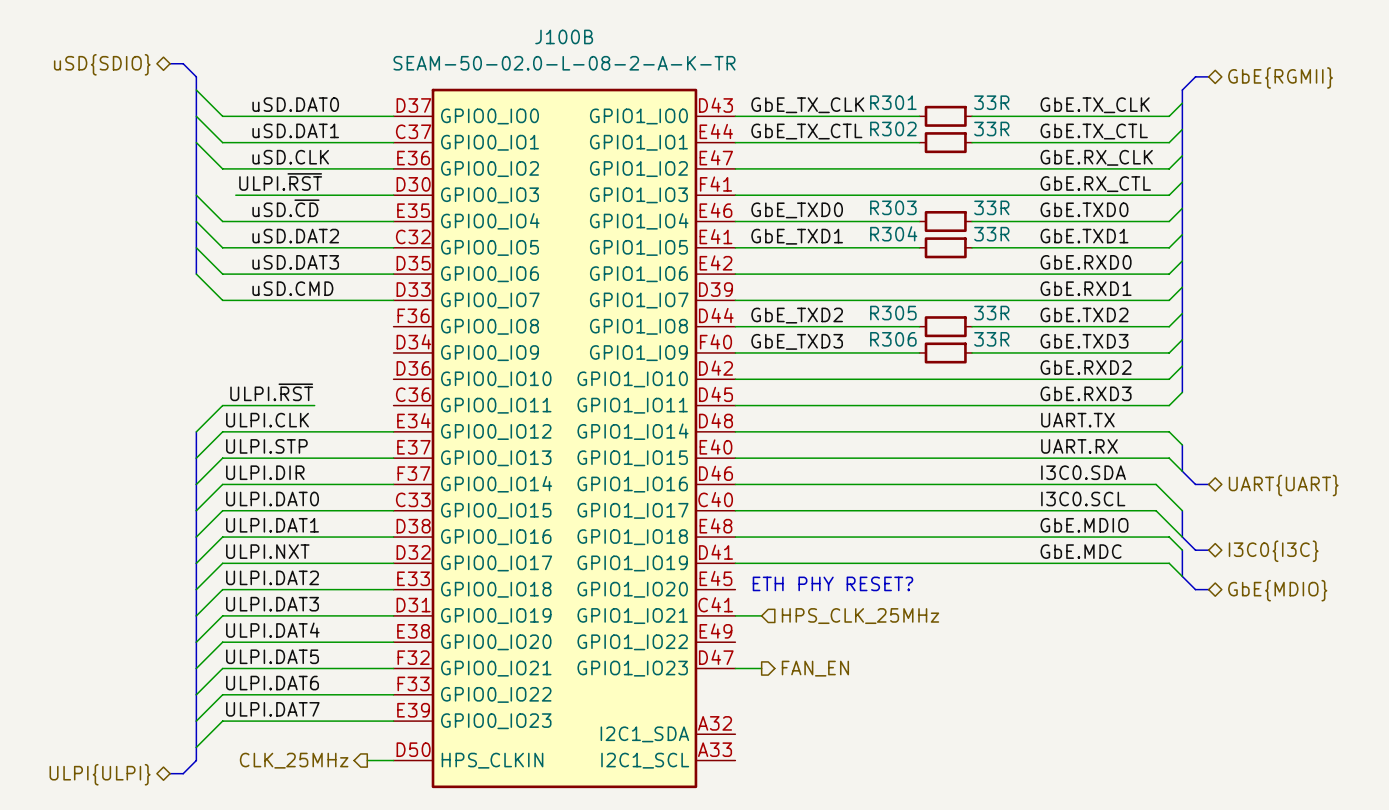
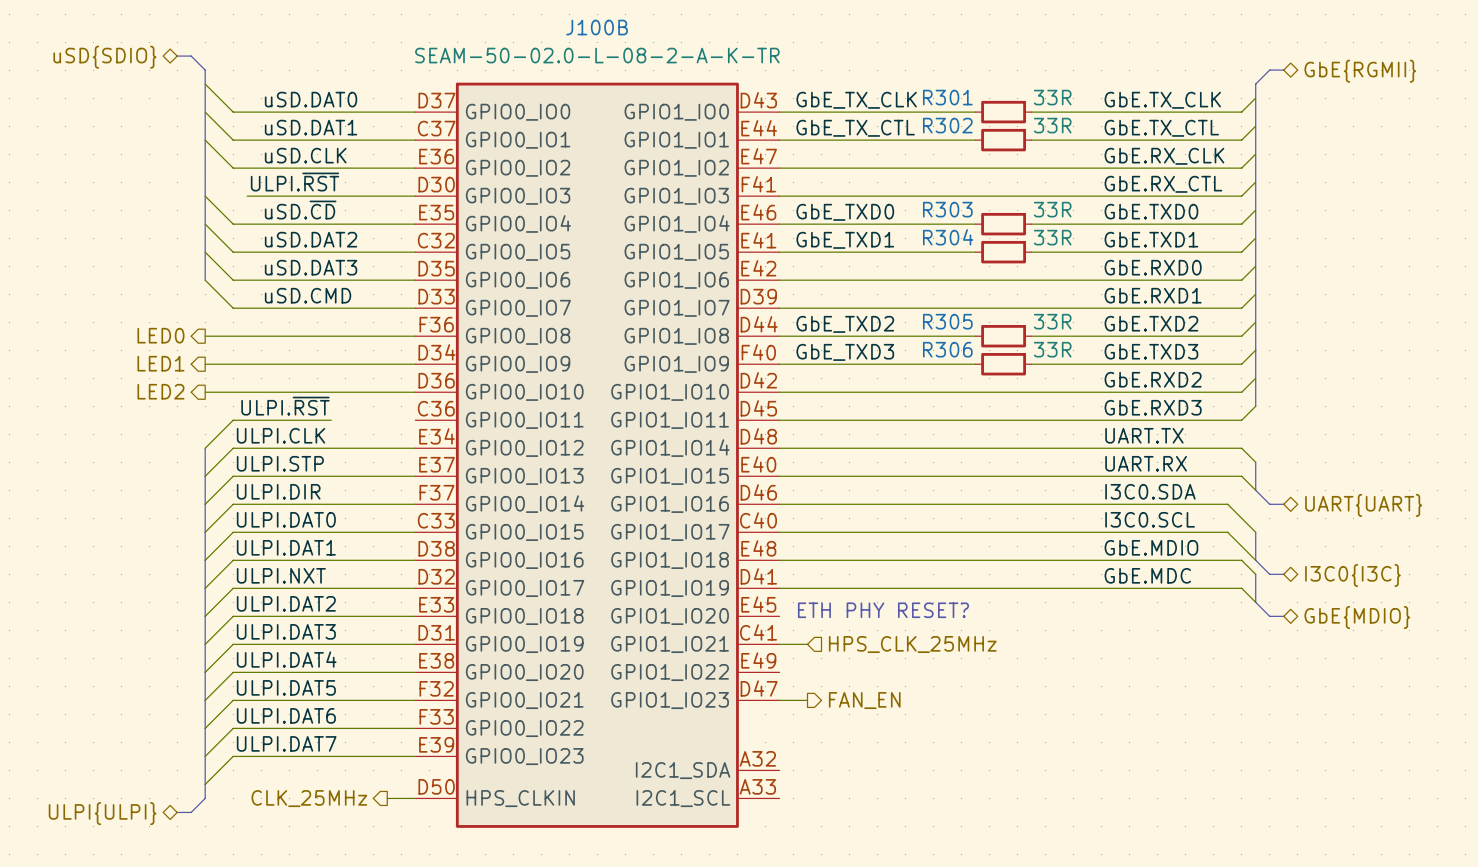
hierarchical label: none -> LED0 (160, 335)
wire: none -> (205, 336) (415, 336)
hierarchical label: none -> LED1 (160, 363)
wire: none -> (205, 364) (415, 364)
hierarchical label: none -> LED2 (160, 391)
wire: none -> (205, 392) (415, 392)

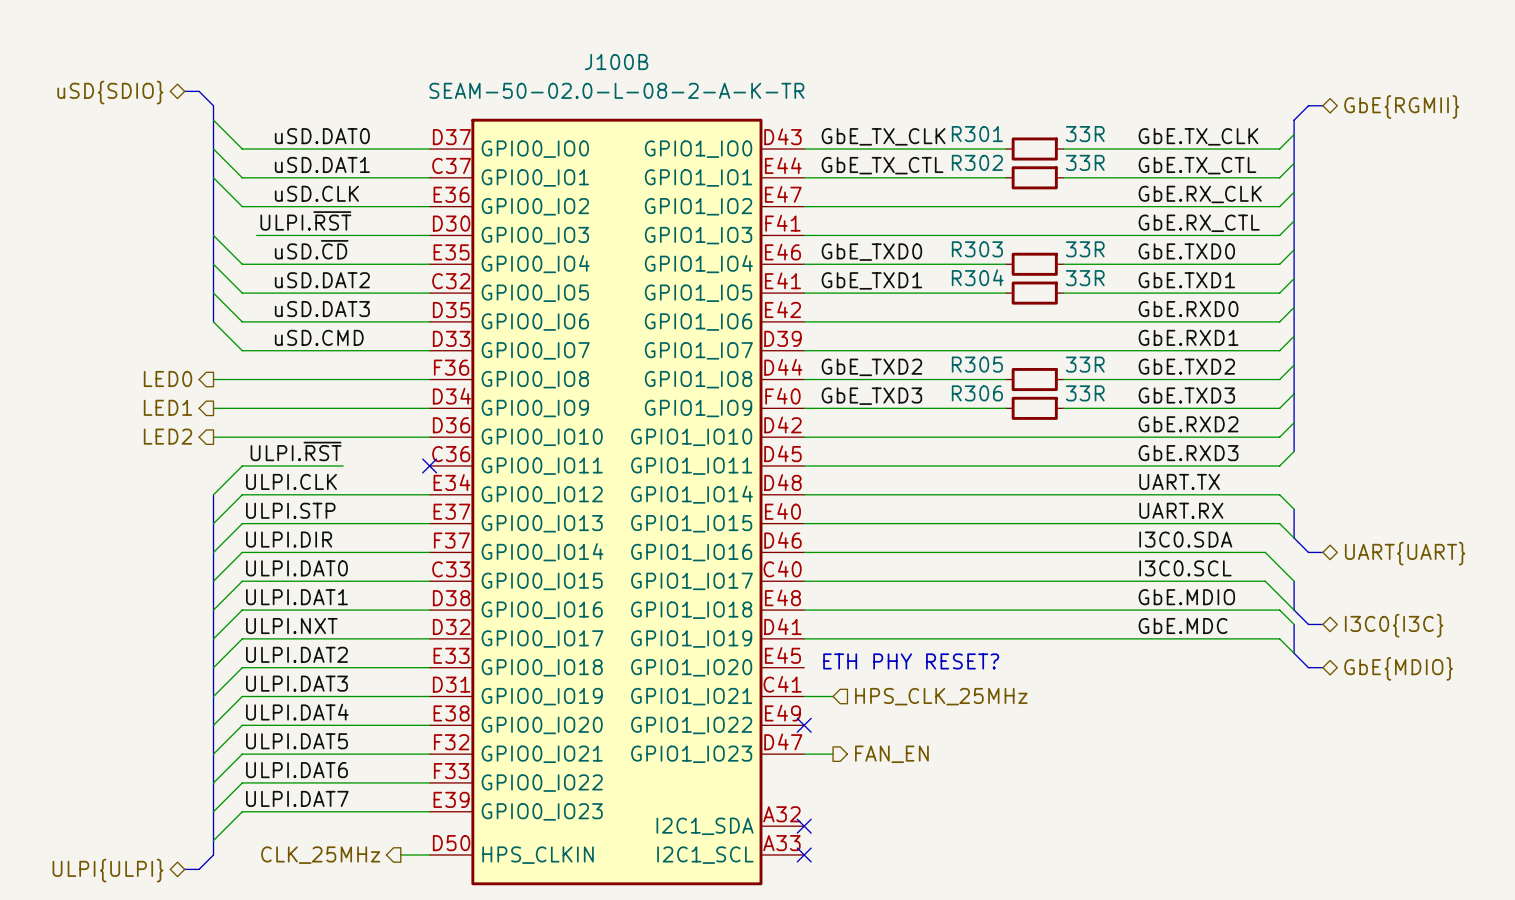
no-connect mark: none -> (429, 465)
no-connect mark: none -> (804, 725)
no-connect mark: none -> (804, 826)
no-connect mark: none -> (804, 854)

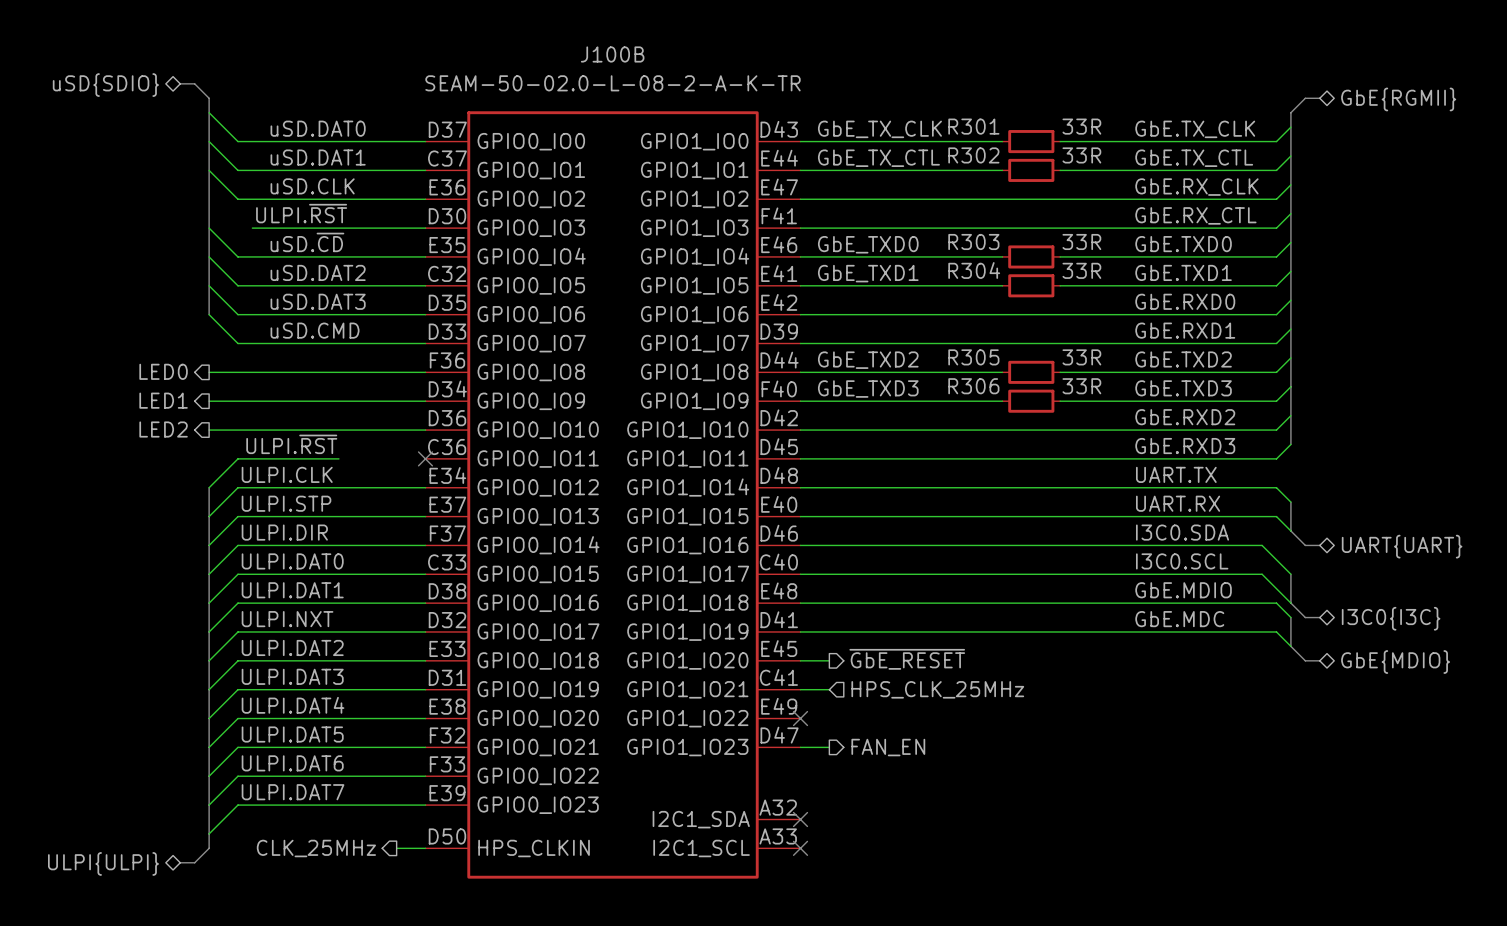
text: ETH PHY RESET? (911, 661) -> none
hierarchical label: none -> ~{GbE_RESET} (907, 659)
wire: none -> (800, 660) (829, 660)

